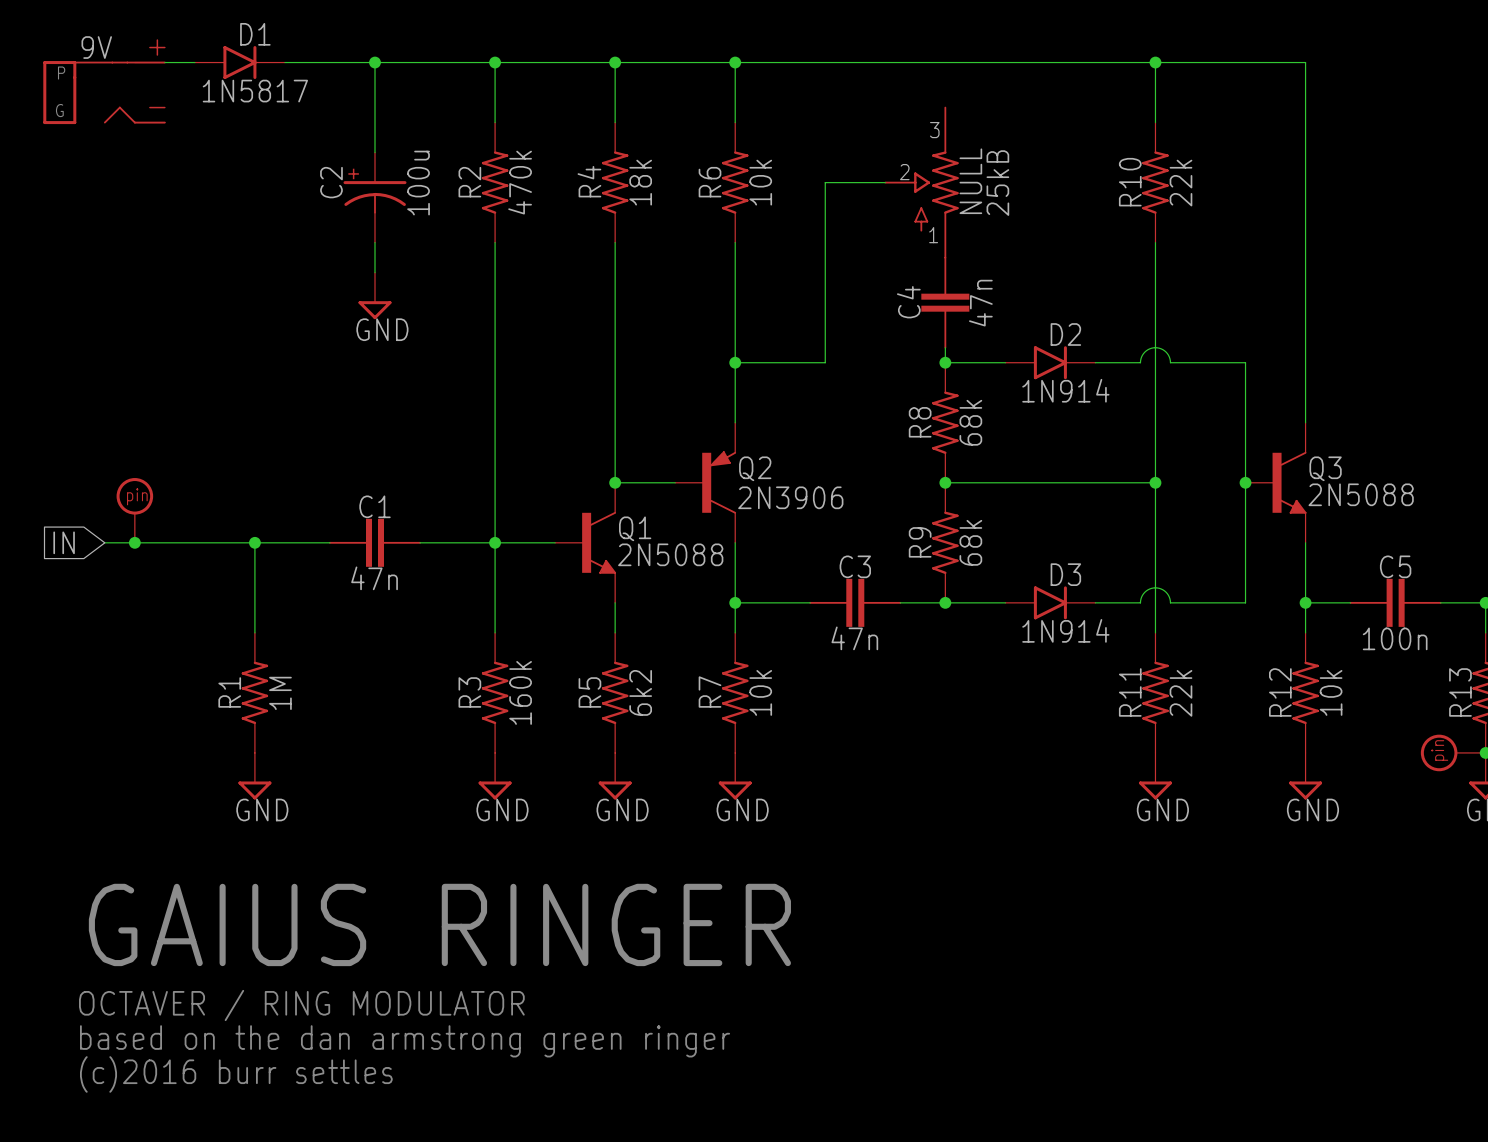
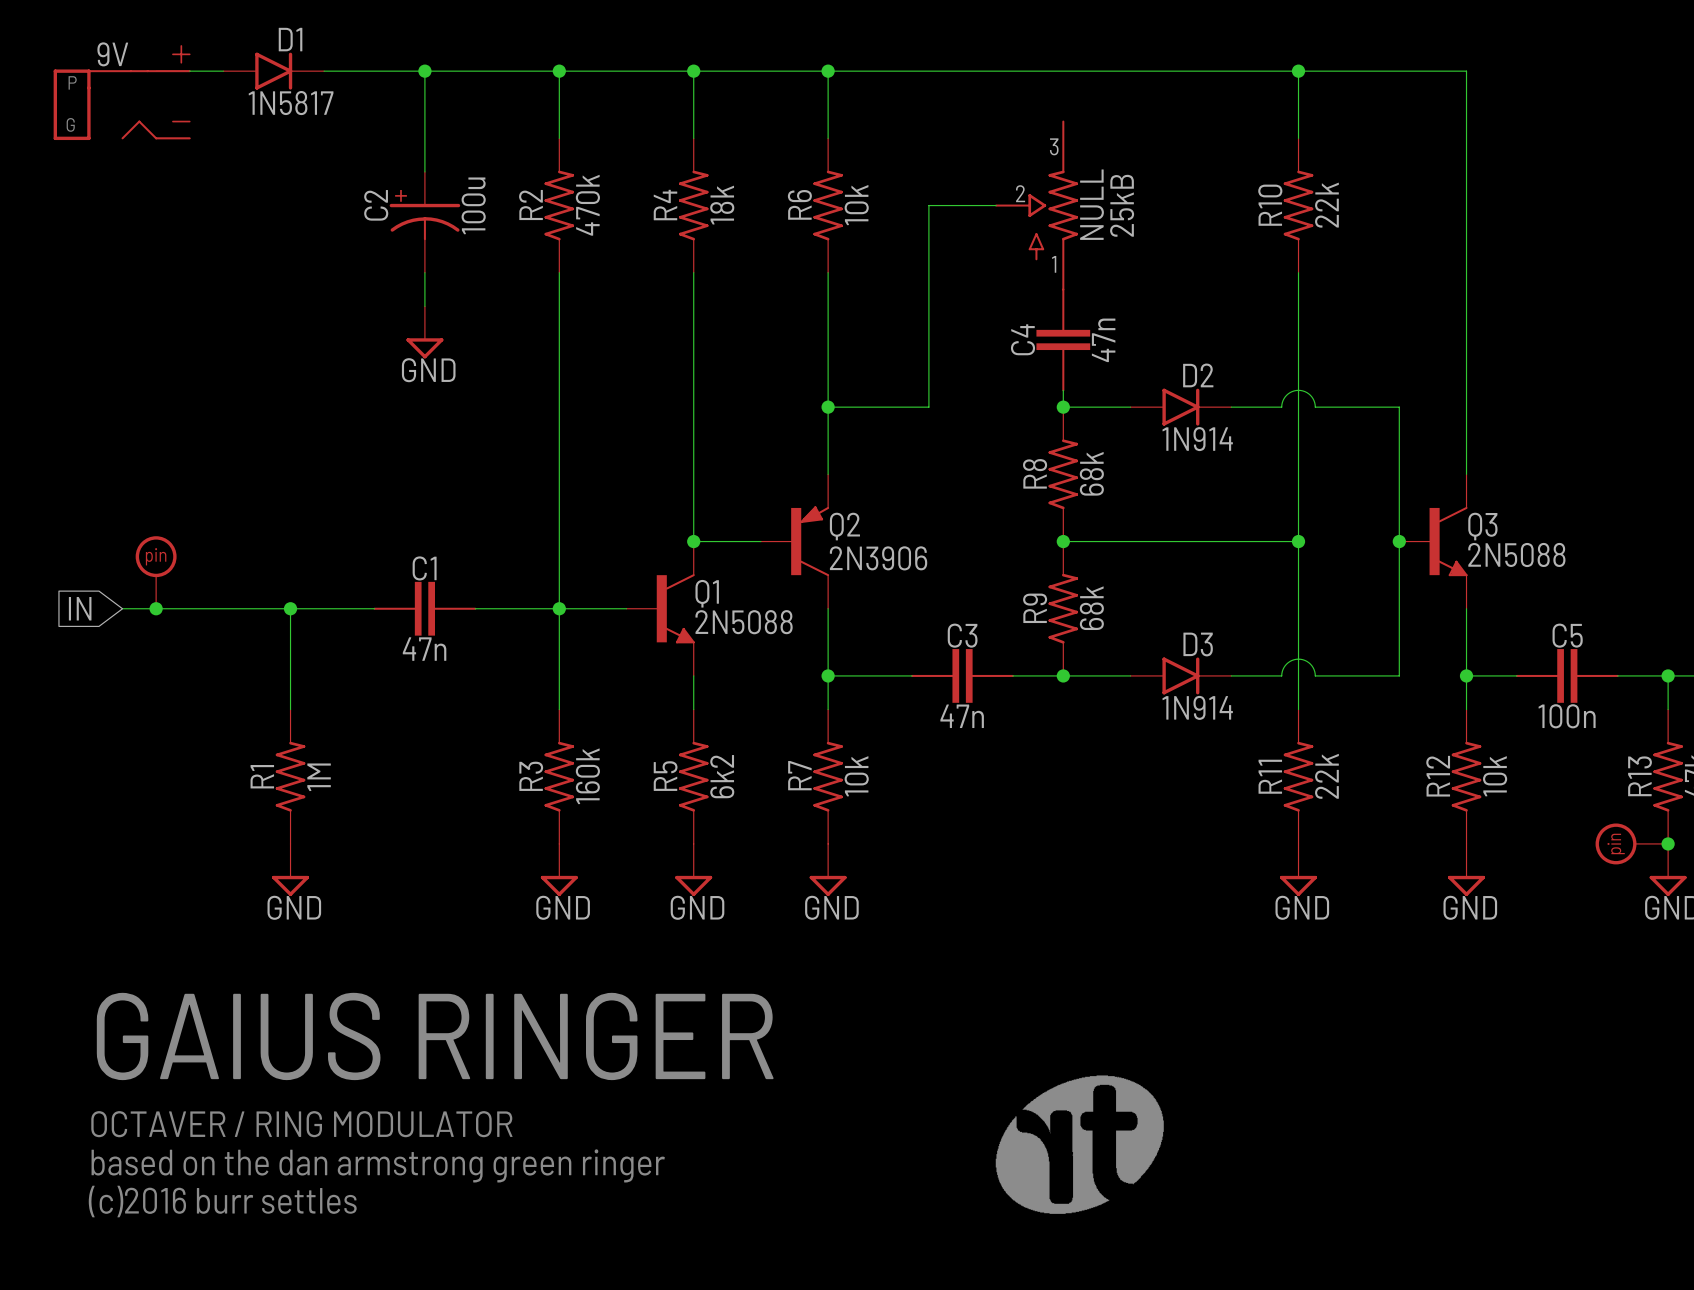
part: none -> (1079, 1144)

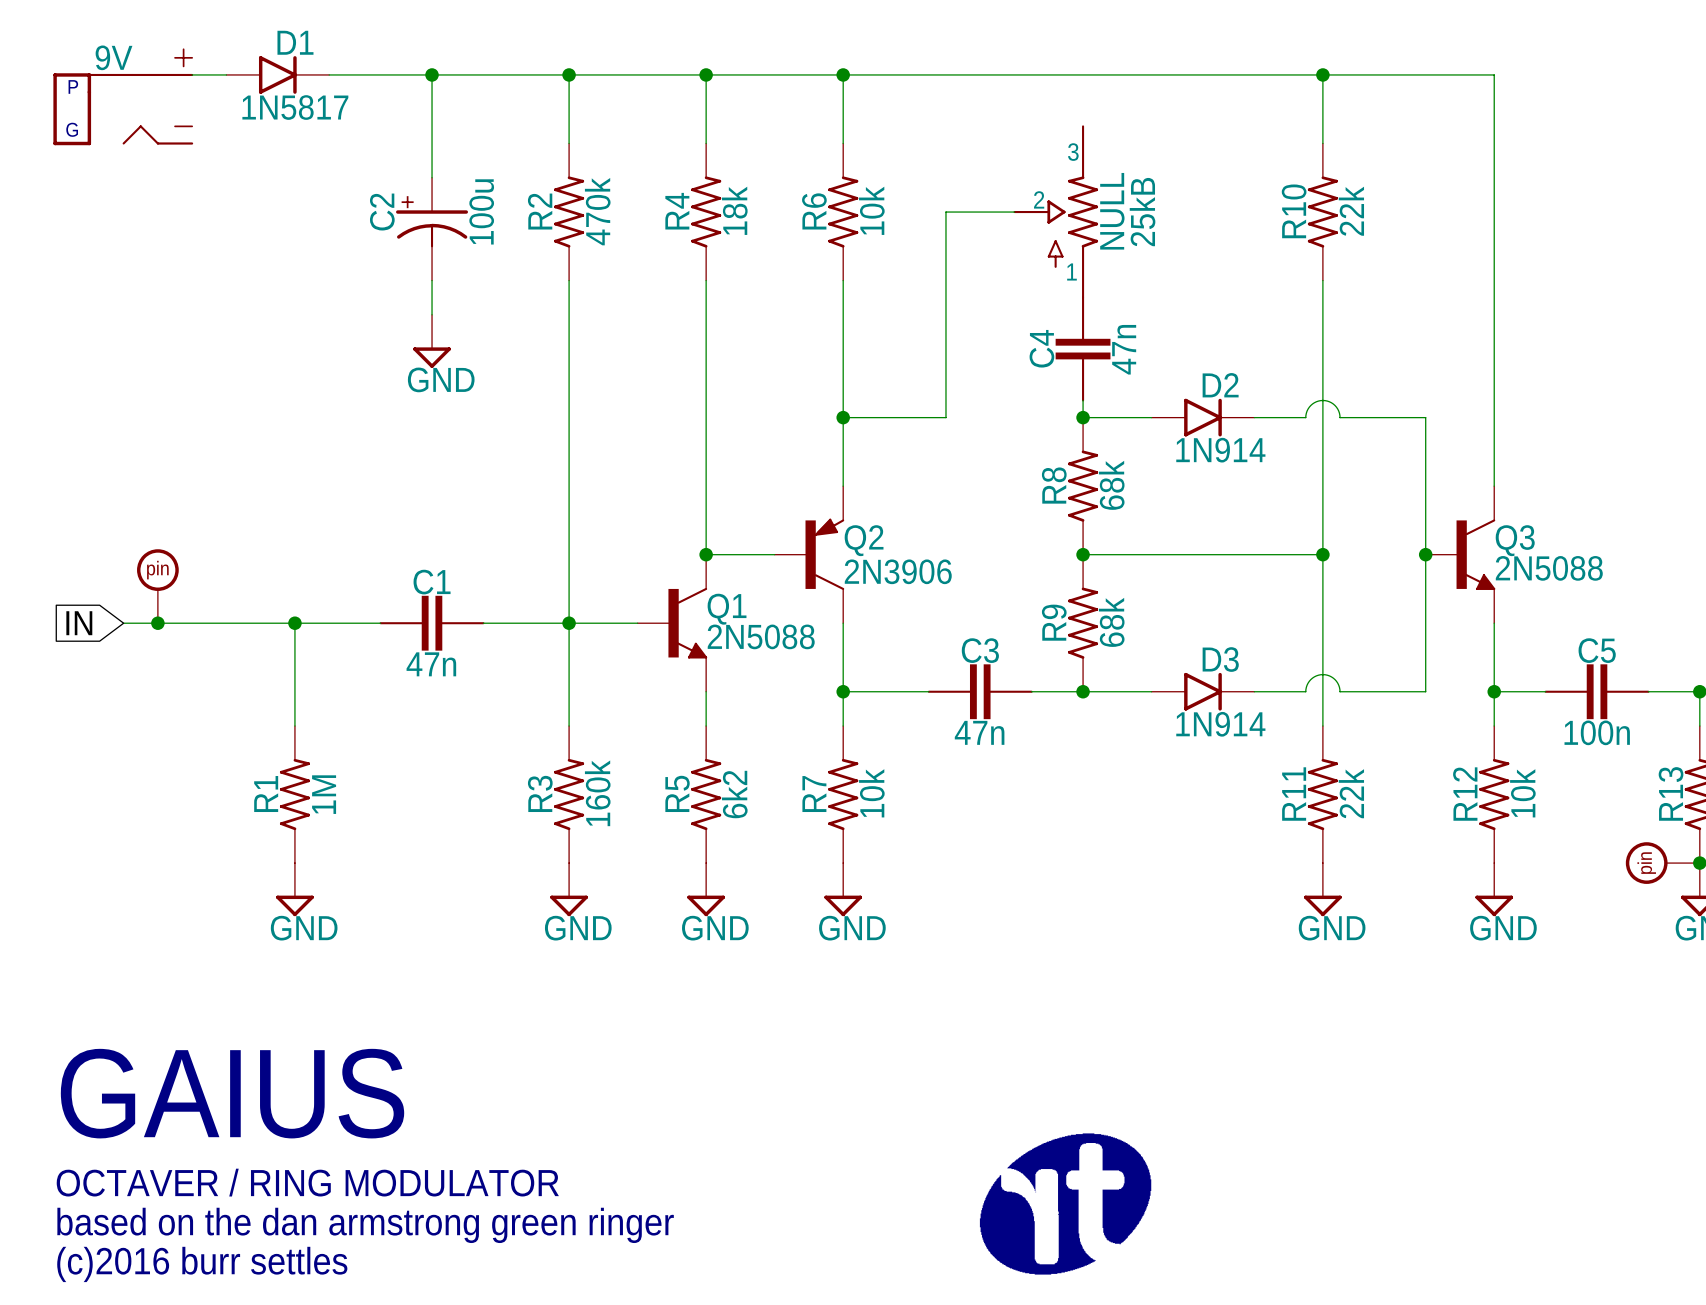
text: GAIUS RINGER (435, 1036) -> none
text: none -> GAIUS (232, 1093)
text position: OCTAVER / RING MODULATOR (301, 1124) -> OCTAVER / RING MODULATOR (307, 1182)
part position: (1079, 1144) -> (1065, 1204)
text position: based on the dan armstrong green ringer (378, 1165) -> based on the dan armstrong green ringer (365, 1225)
text position: (c)2016 burr settles (222, 1201) -> (c)2016 burr settles (202, 1264)

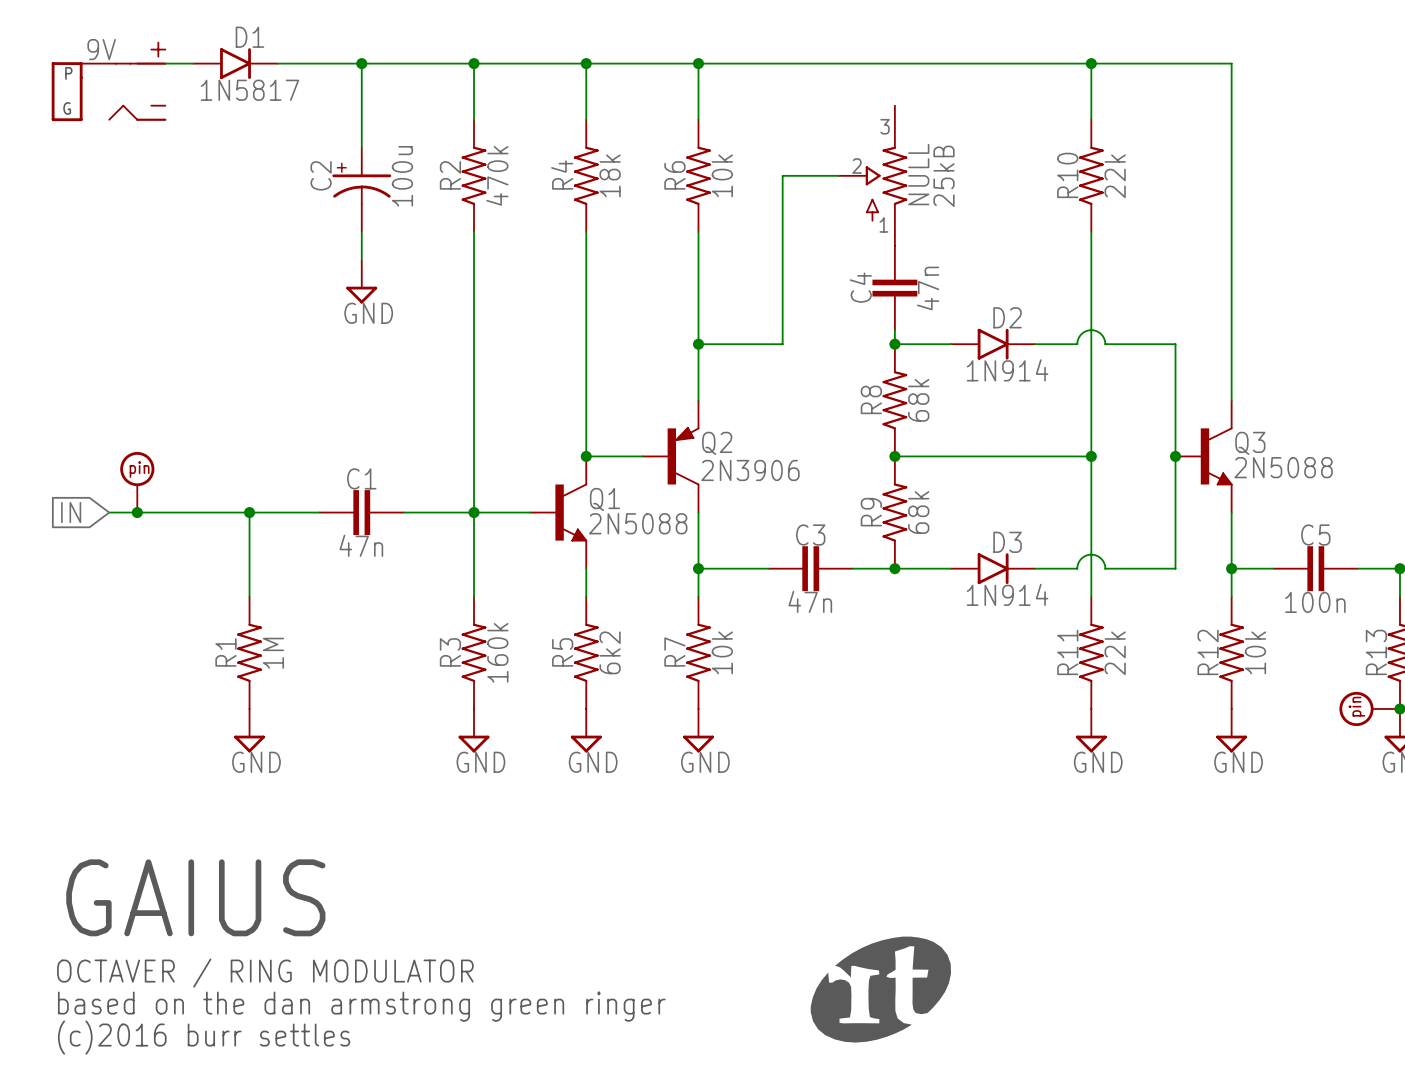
part symbol: [979, 1133, 1152, 1275] -> [810, 936, 952, 1043]

